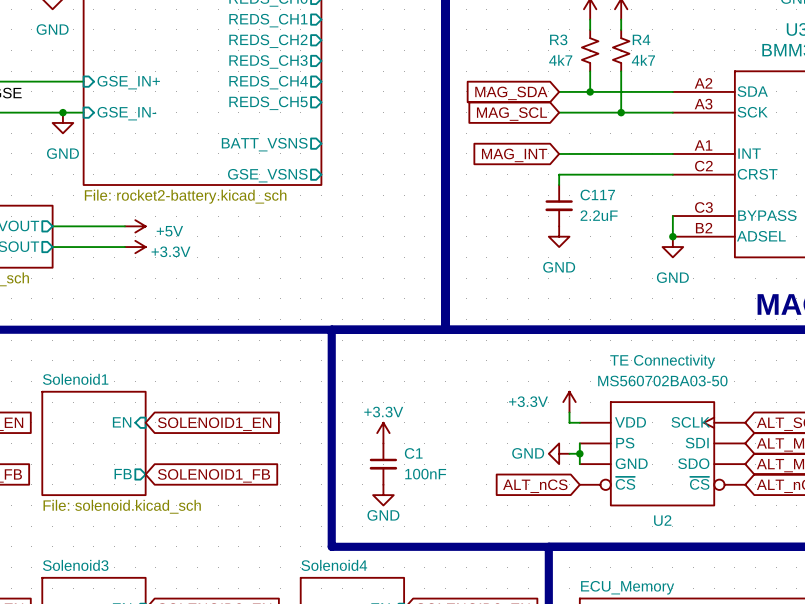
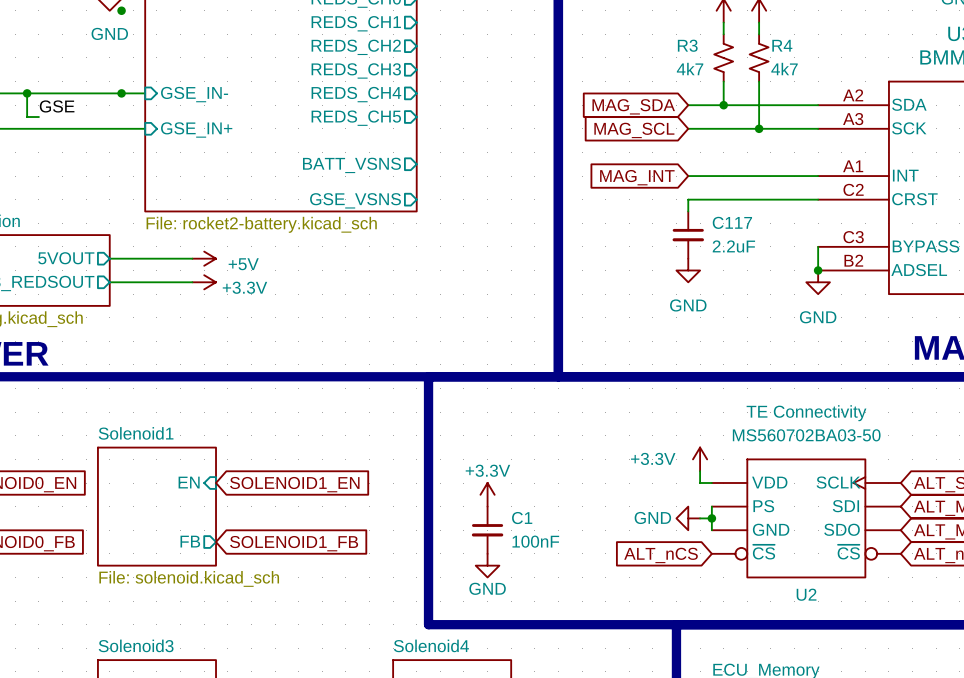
junction: none -> (121, 10)
sheet pin: GSE_IN+ (128, 82) -> GSE_IN- (194, 94)
junction position: (62, 112) -> (121, 93)
sheet pin: GSE_IN- (126, 113) -> GSE_IN+ (196, 129)
power symbol: GND (62, 122) -> none

